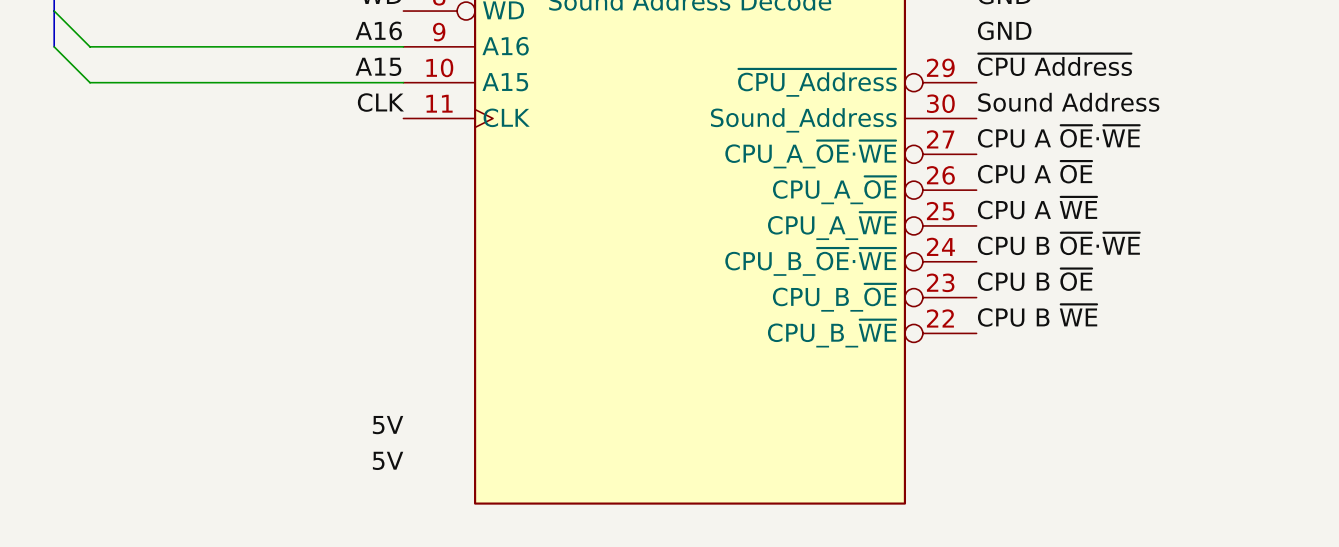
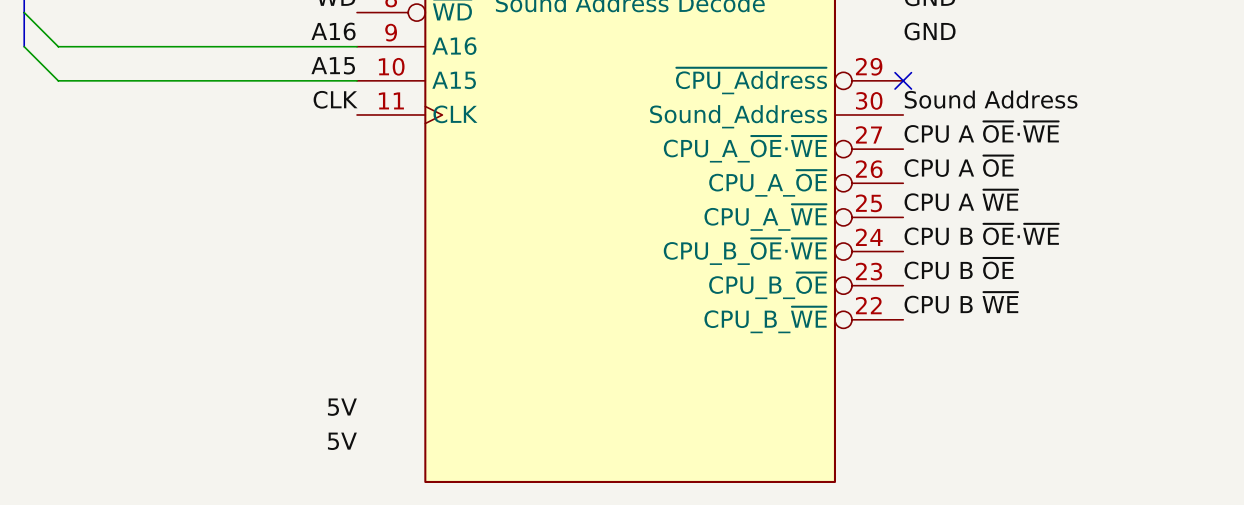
label: ~{CPU Address} (1054, 64) -> none
no-connect mark: none -> (903, 80)

